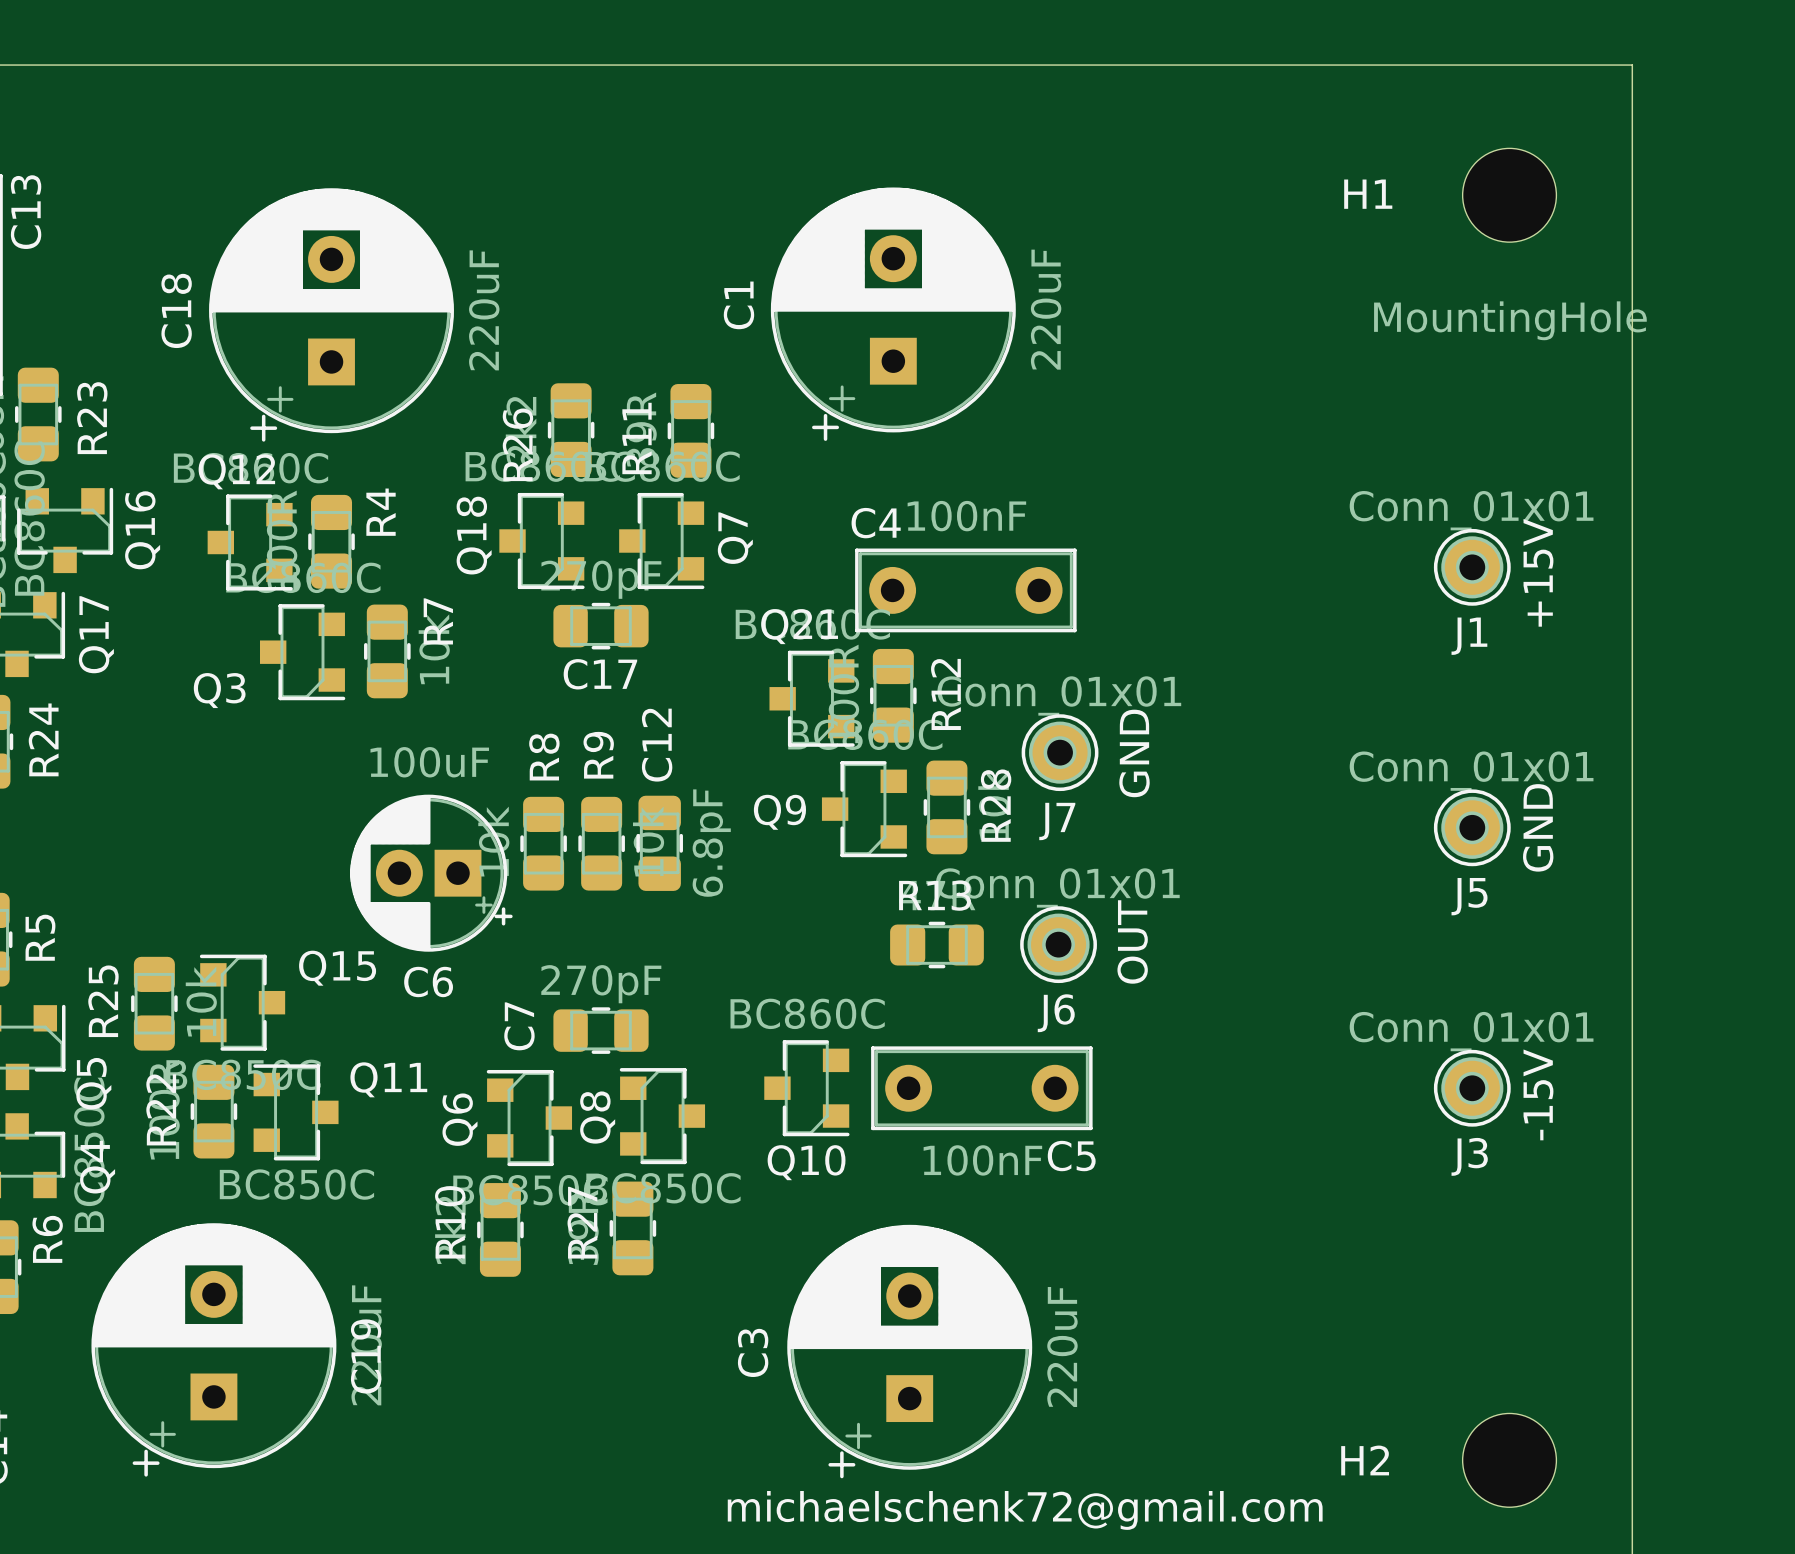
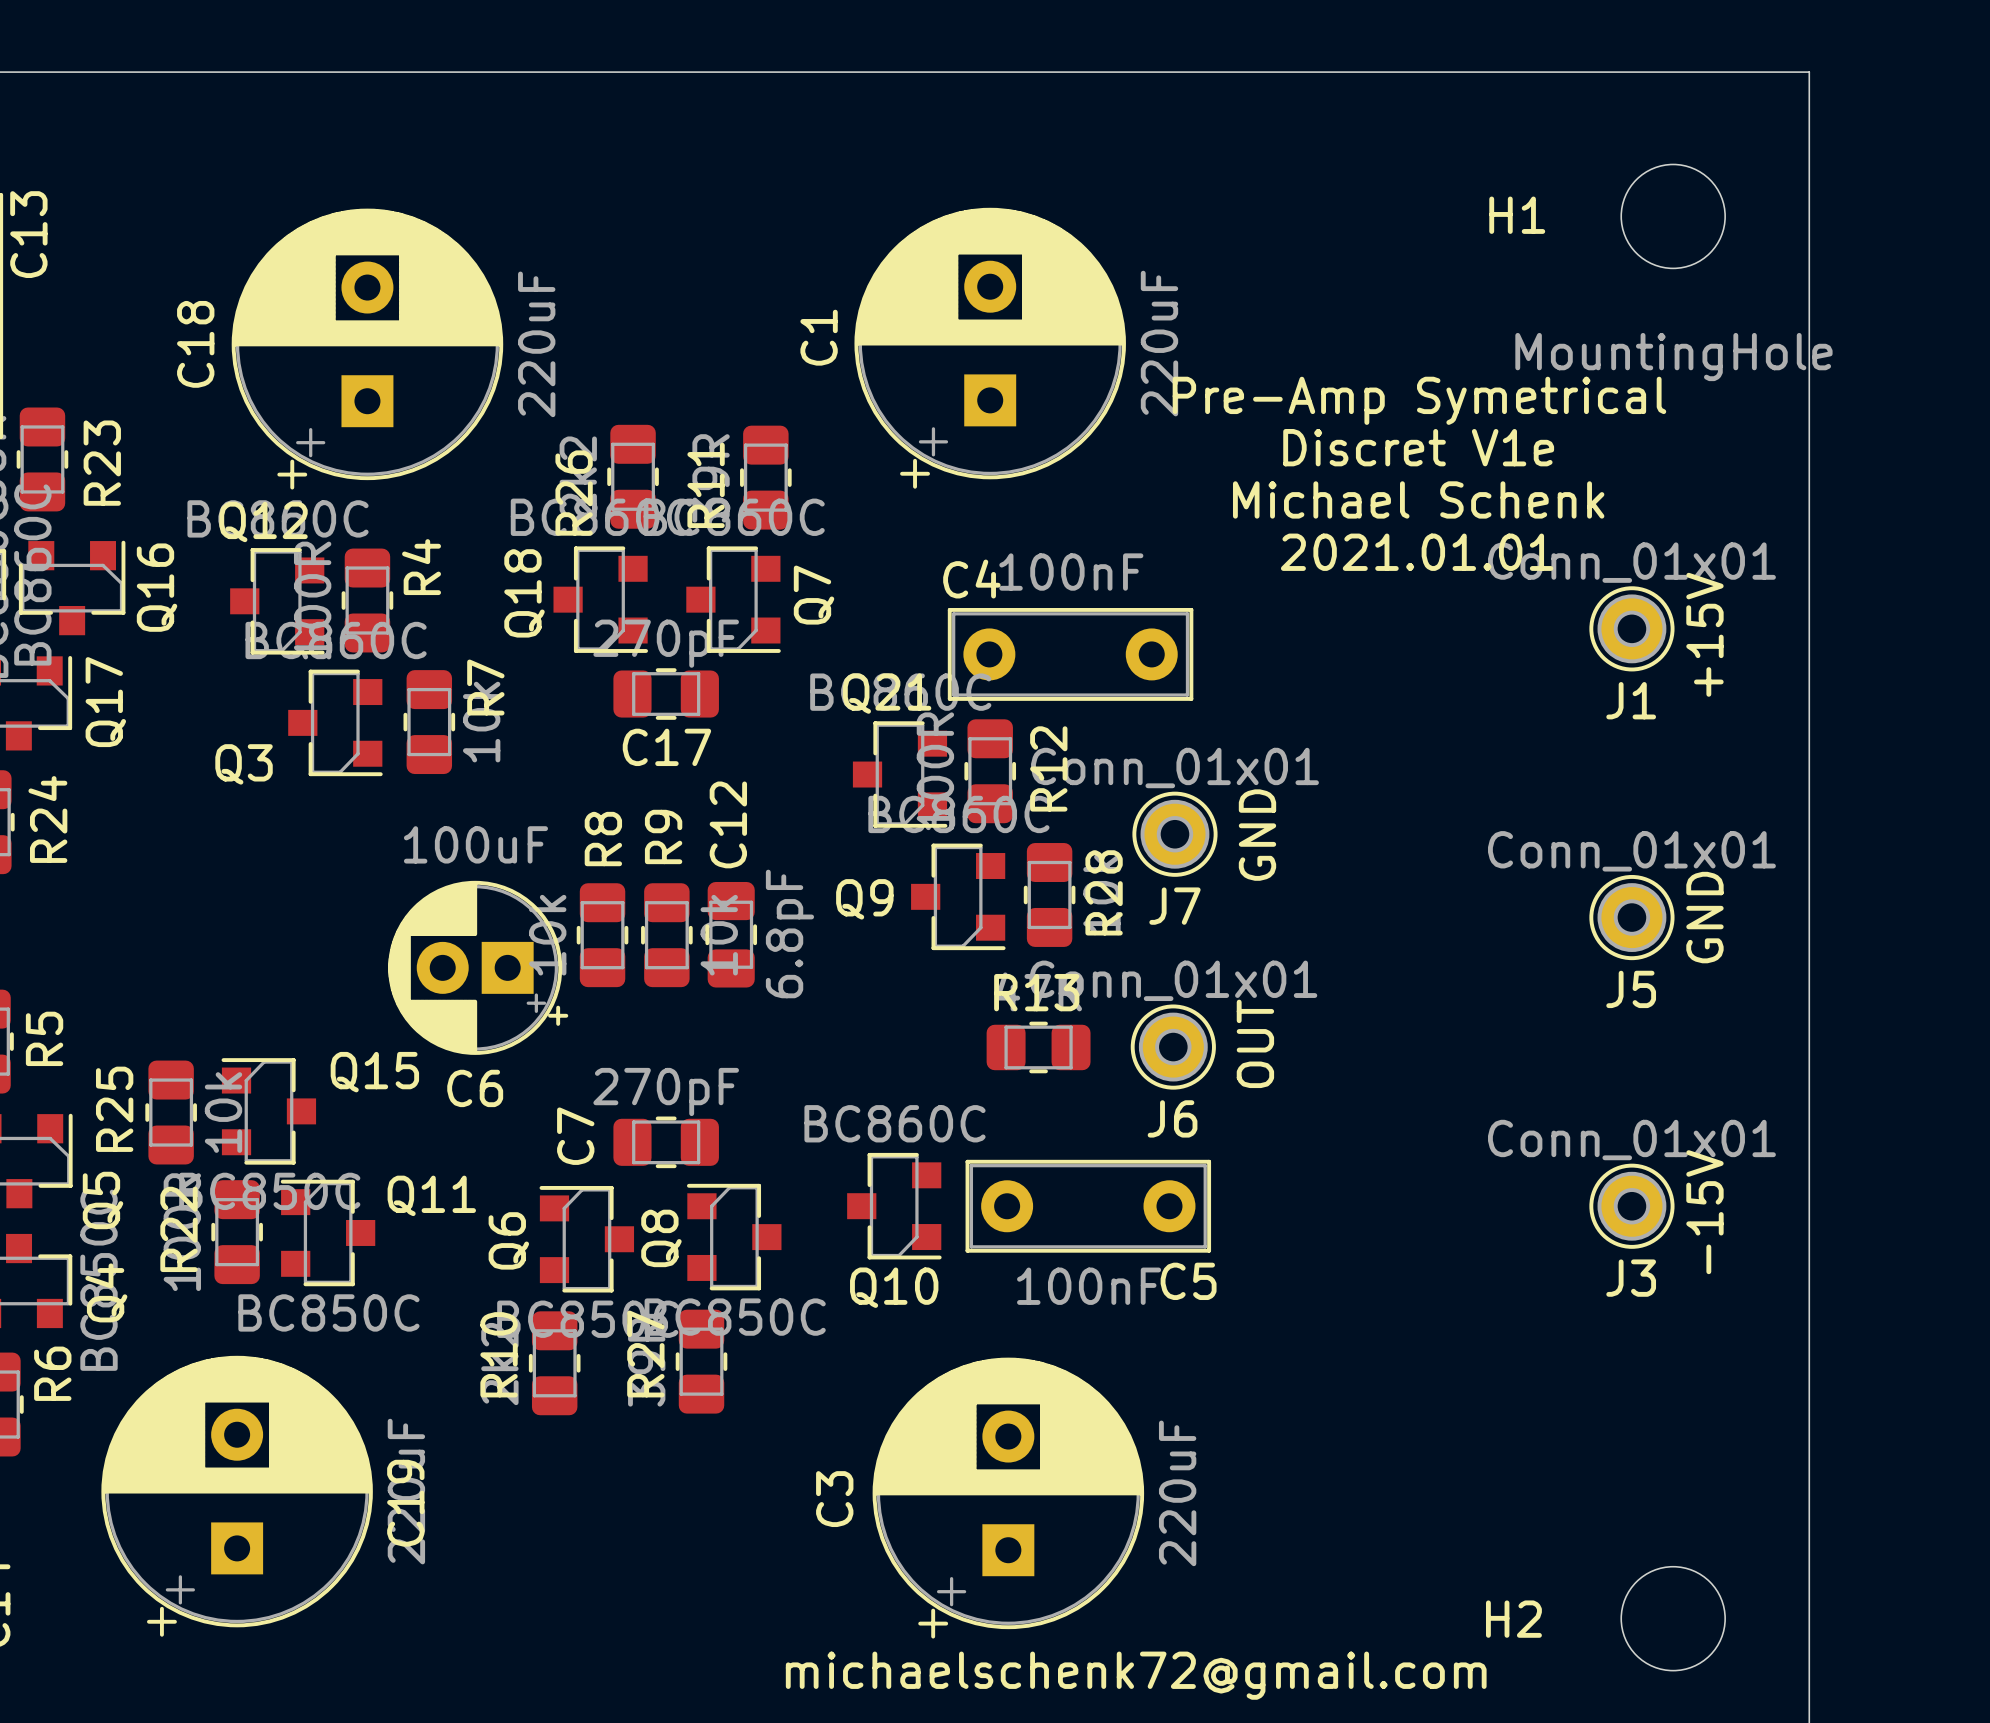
text: none -> Pre-Amp Symetrical (1419, 400)
text: none -> Discret V1e (1418, 447)
text: none -> Michael Schenk (1418, 499)
text: none -> 2021.01.01 (1417, 552)

